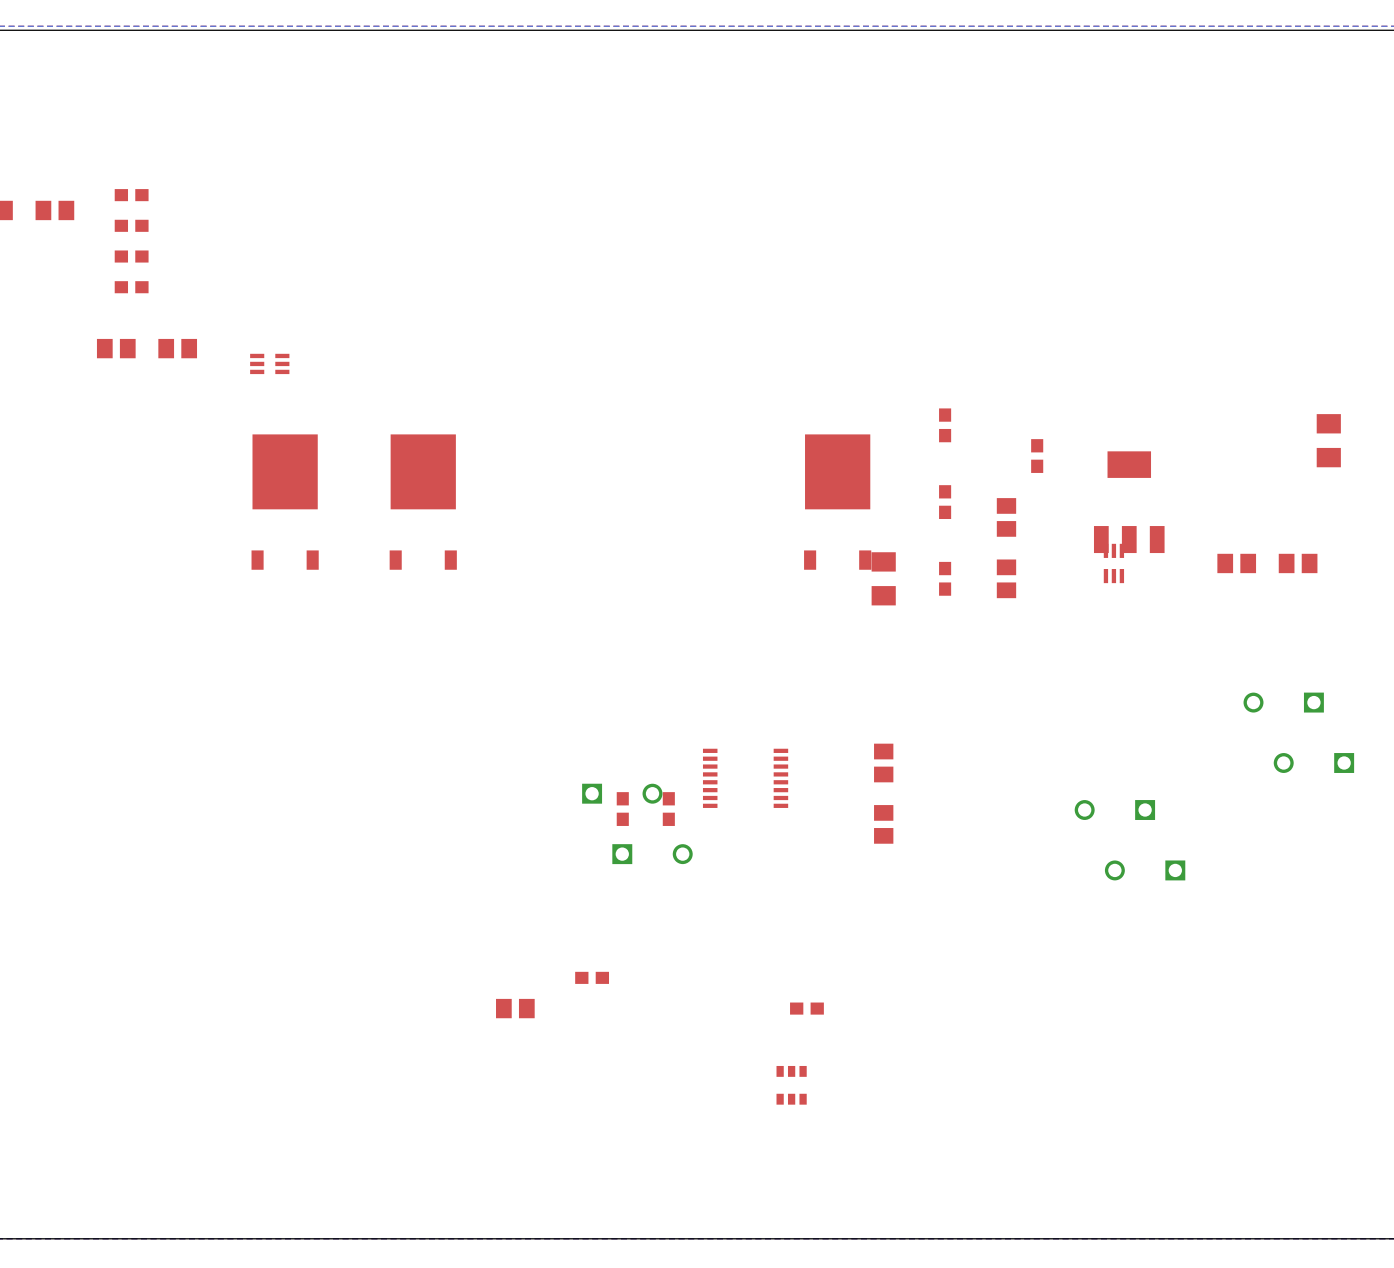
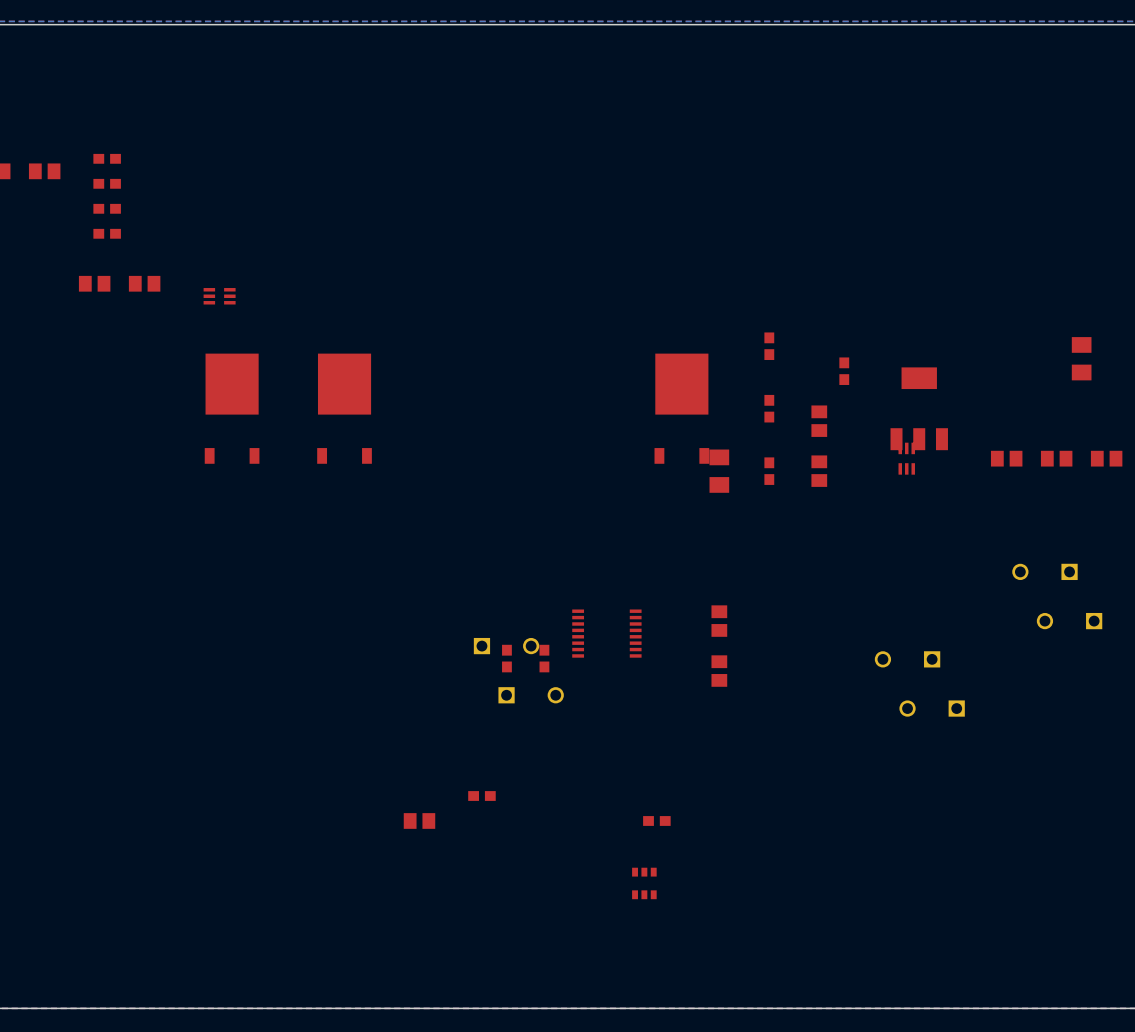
part: none -> (1106, 458)

